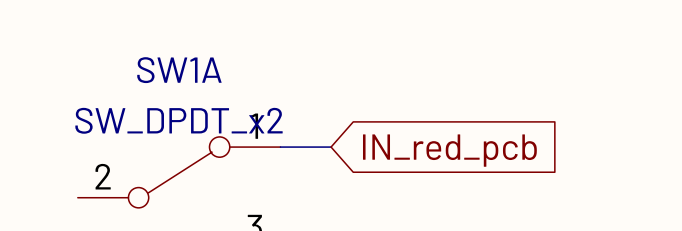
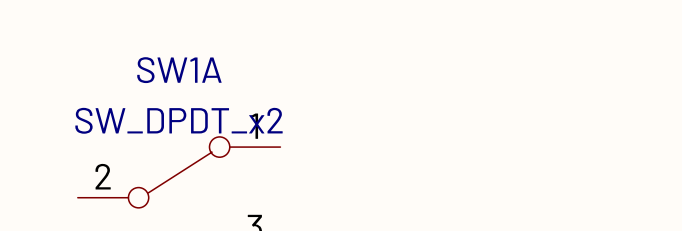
wire: (280, 147) (331, 147) -> none
global label: IN_red_pcb (449, 150) -> none

